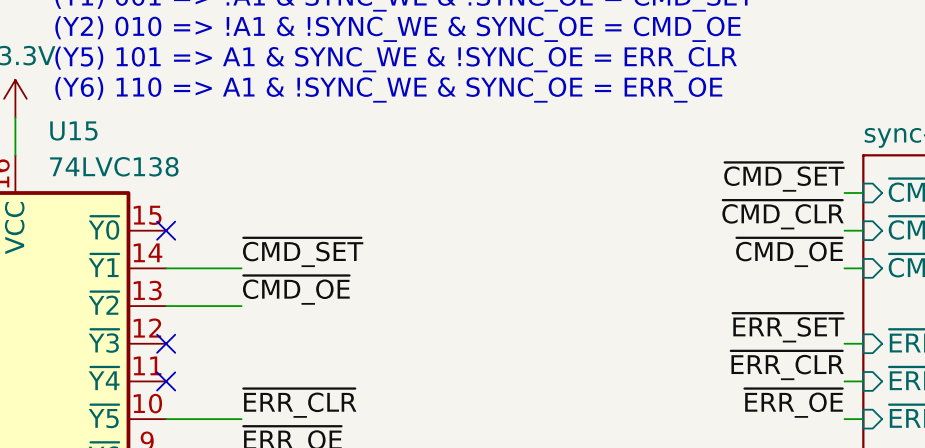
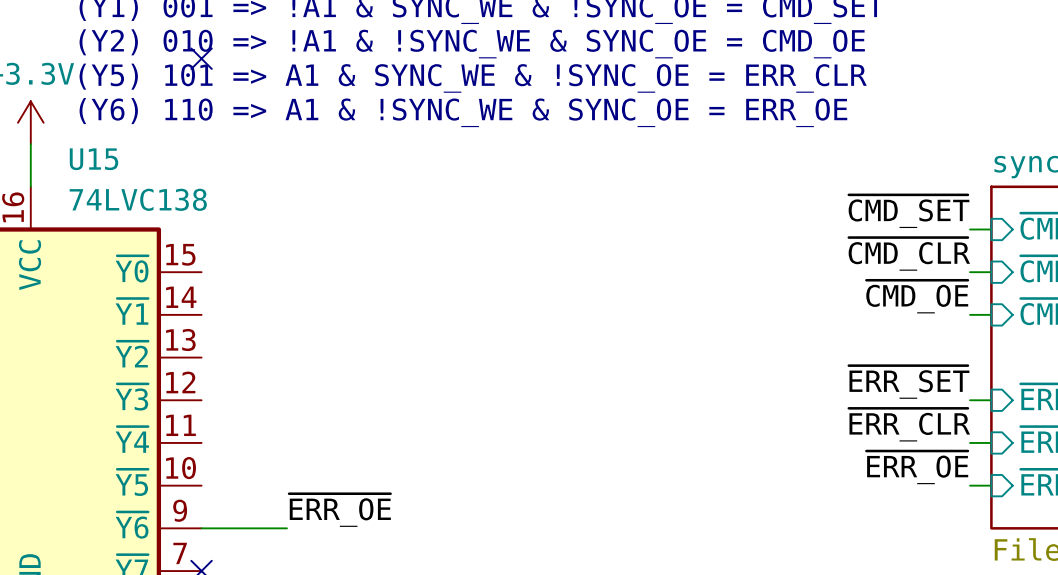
no-connect mark: none -> (201, 58)
no-connect mark: (166, 230) -> none
label: ~{CMD_SET} (303, 252) -> none
wire: (166, 268) (241, 268) -> none
label: ~{CMD_OE} (296, 290) -> none
wire: (166, 306) (241, 306) -> none
no-connect mark: (166, 343) -> none
no-connect mark: (166, 381) -> none
label: ~{ERR_CLR} (299, 403) -> none
wire: (166, 419) (241, 419) -> none

